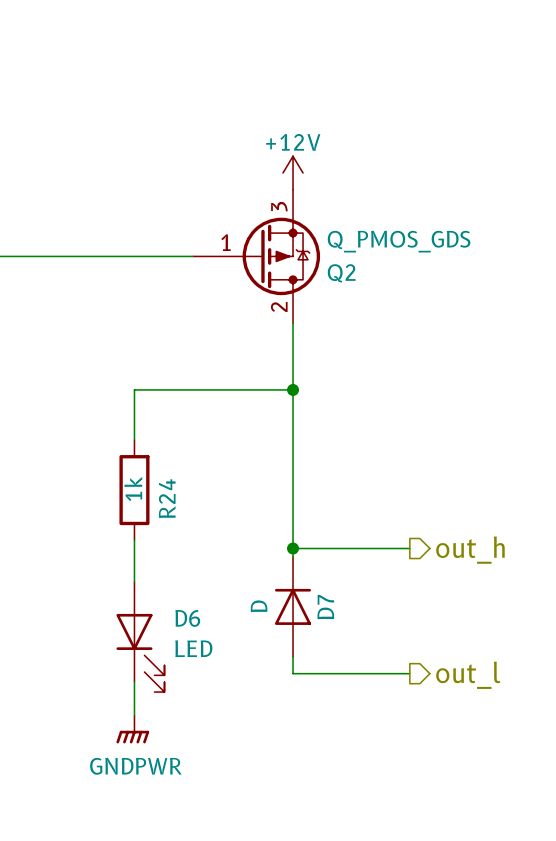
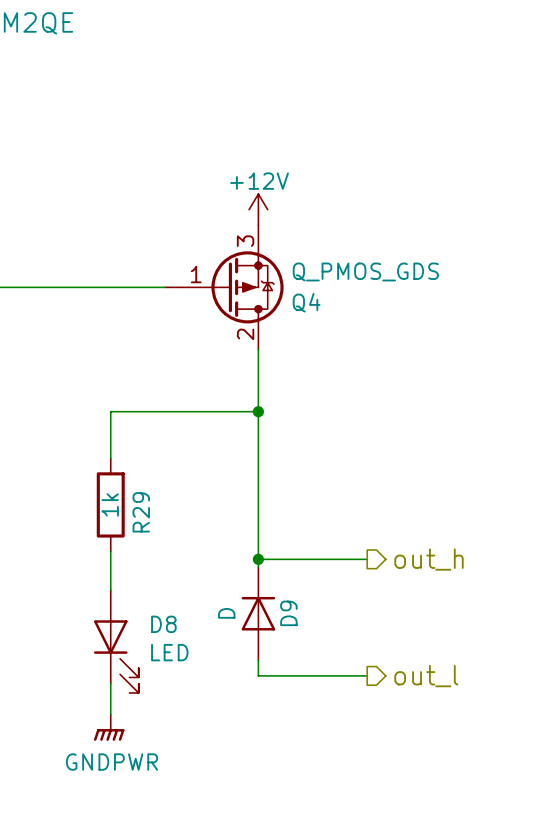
Q2 name: Q2 (341, 273) -> Q4 (306, 302)
R24 name: R24 (167, 498) -> R29 (141, 512)
D7 name: D7 (325, 607) -> D9 (288, 613)
D6 name: D6 (187, 618) -> D8 (163, 624)

